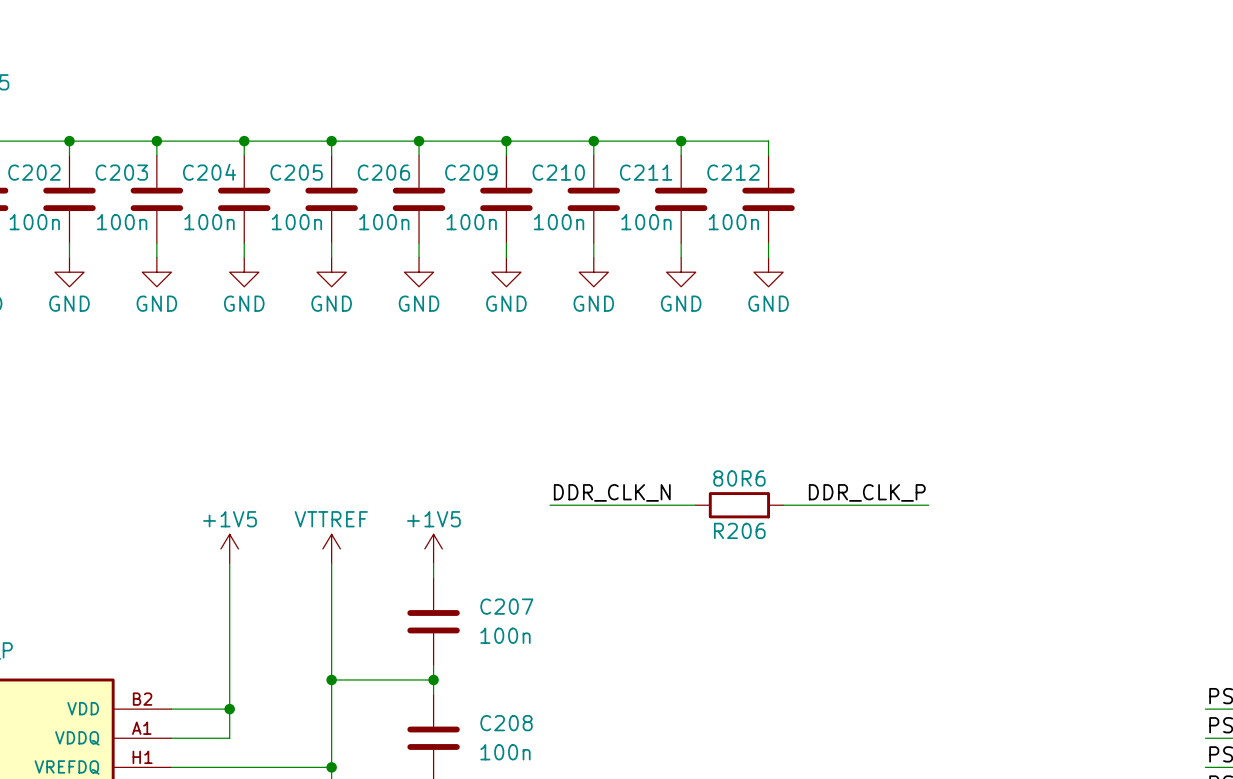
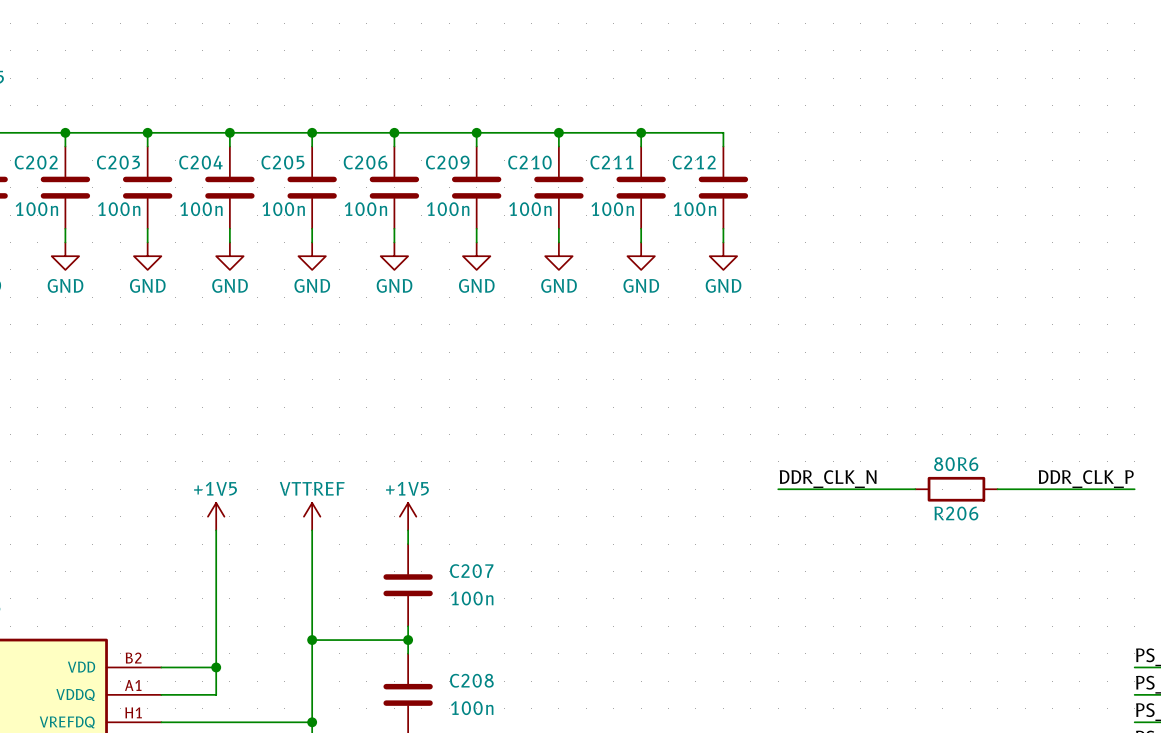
label position: DDR_CLK_N (612, 492) -> DDR_CLK_N (828, 479)
label position: DDR_CLK_P (867, 492) -> DDR_CLK_P (1086, 479)
wire: (550, 505) (695, 505) -> none
R206 position: (739, 505) -> (956, 489)
wire: (783, 505) (928, 505) -> (778, 489) (915, 489)
wire: none -> (997, 489) (1134, 489)

